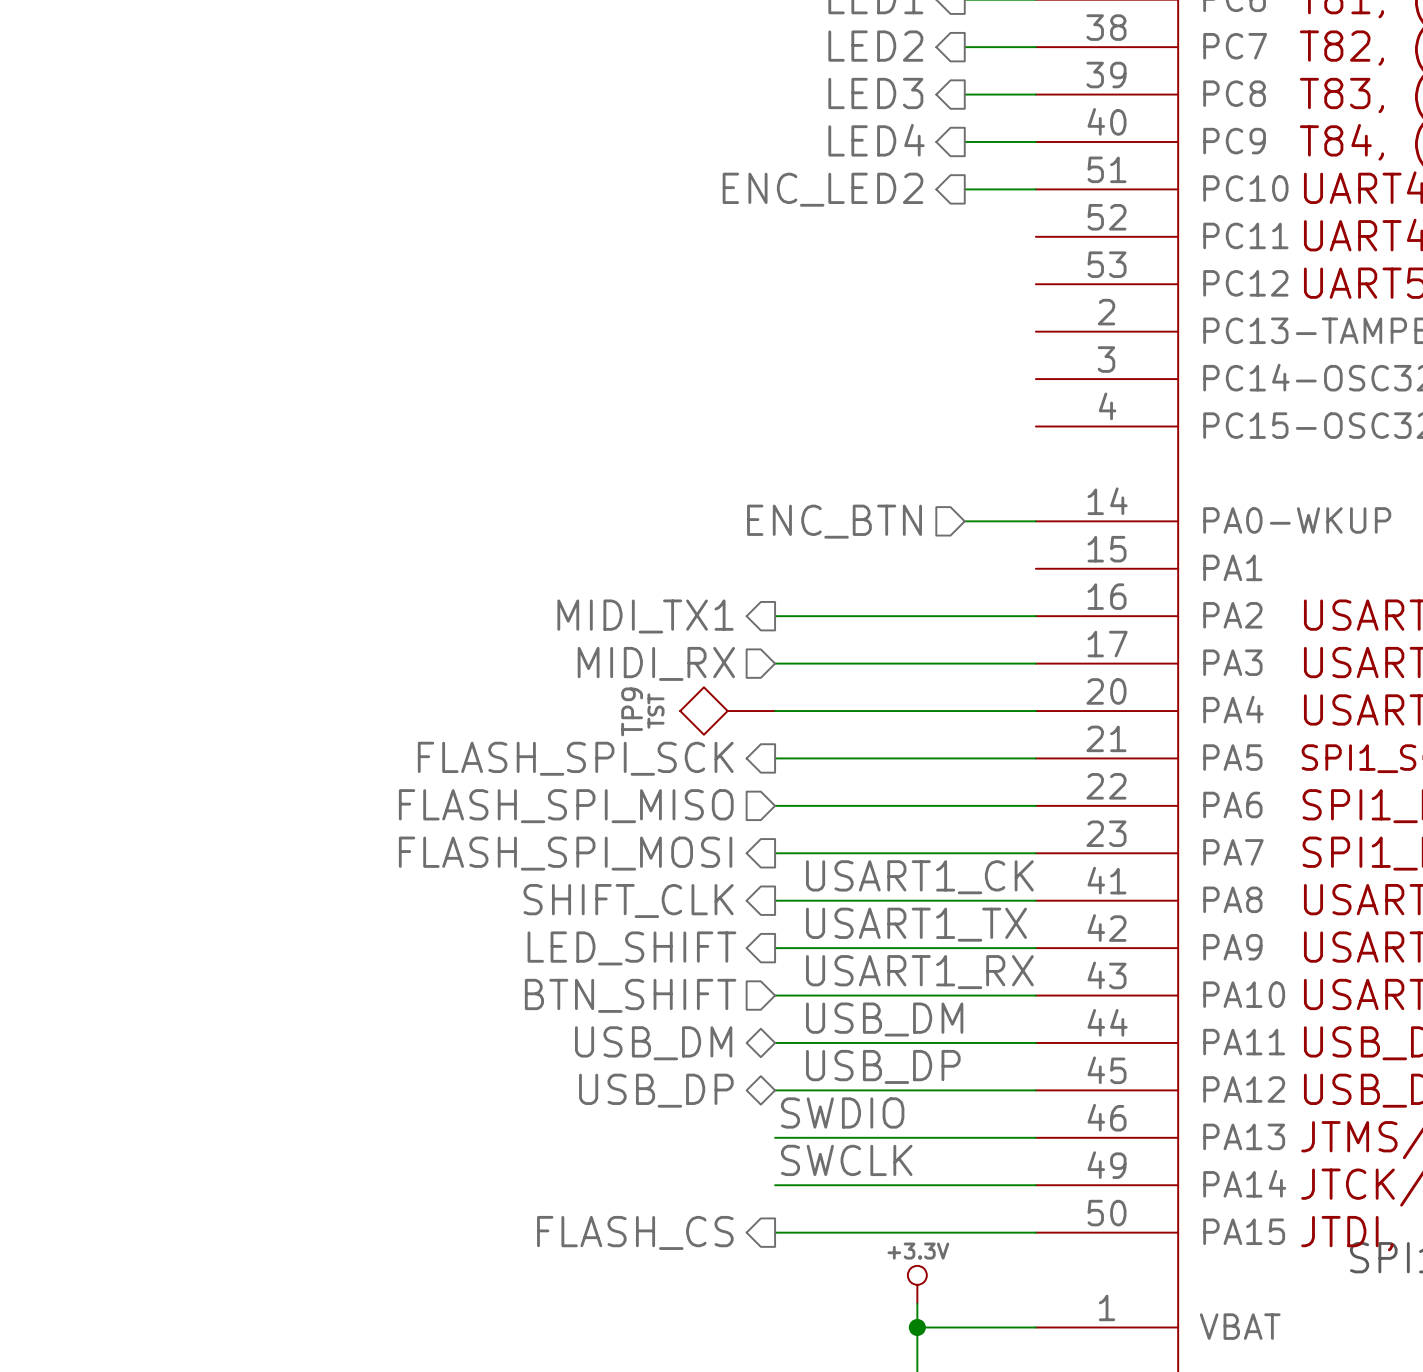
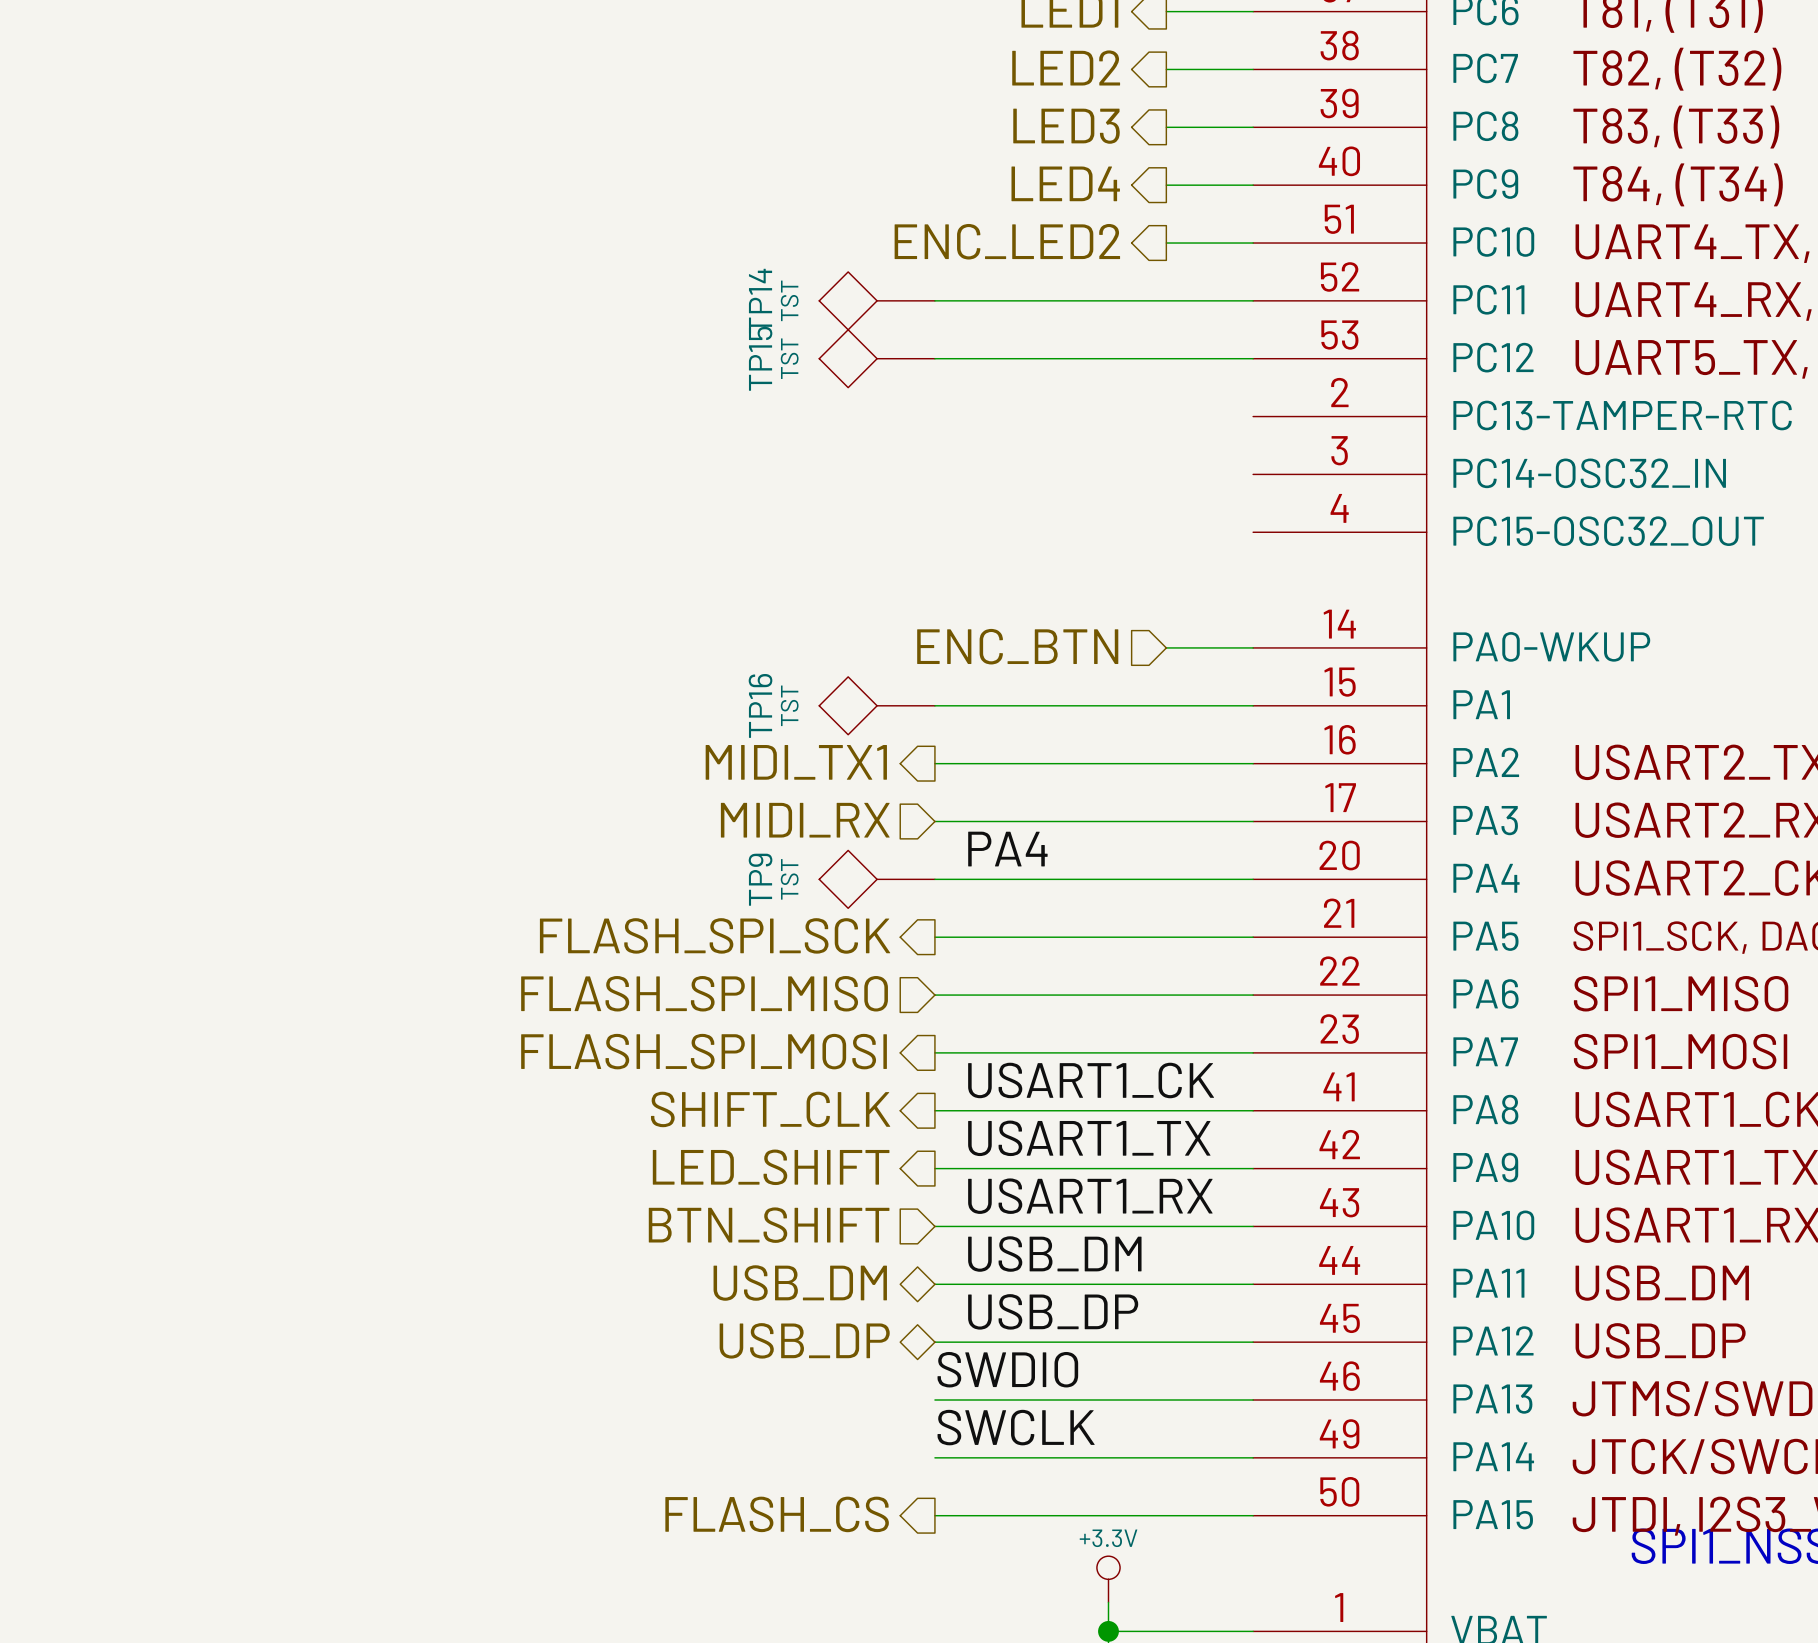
TP14: none -> TST (877, 300)
wire: none -> (934, 300) (1253, 300)
TP15: none -> TST (877, 358)
wire: none -> (934, 358) (1253, 358)
TP16: none -> TST (877, 705)
wire: none -> (934, 705) (1253, 705)
label: none -> PA4 (1007, 849)

